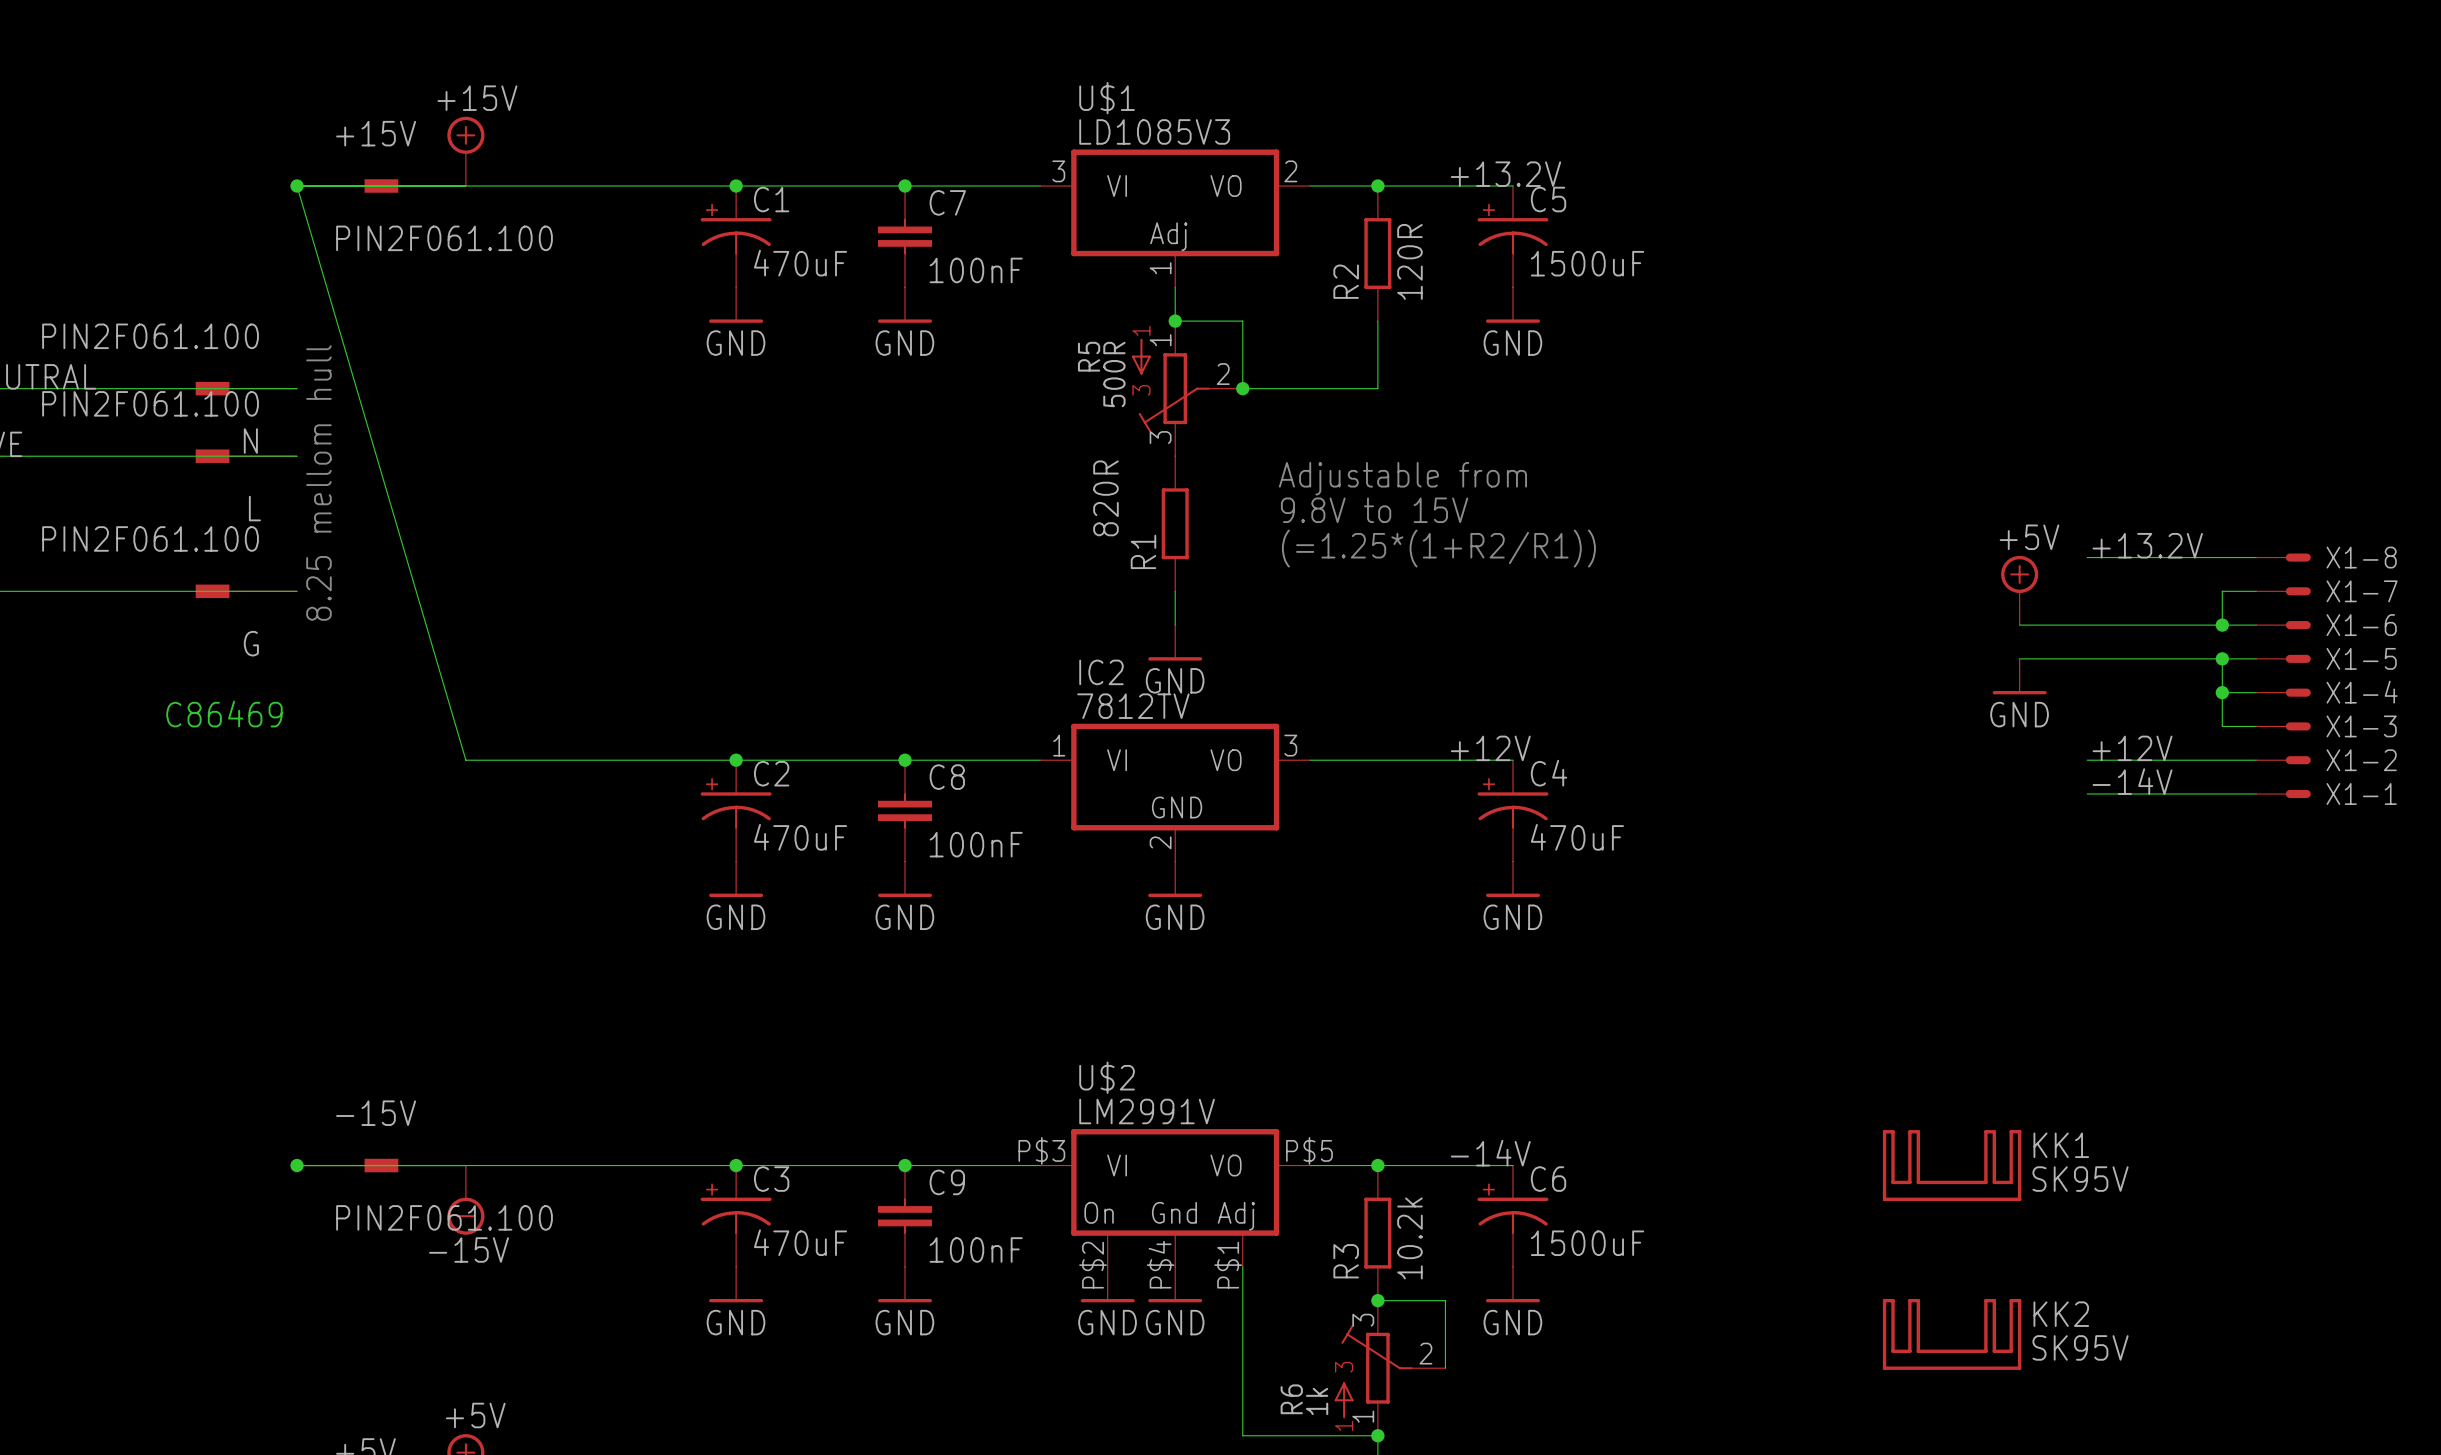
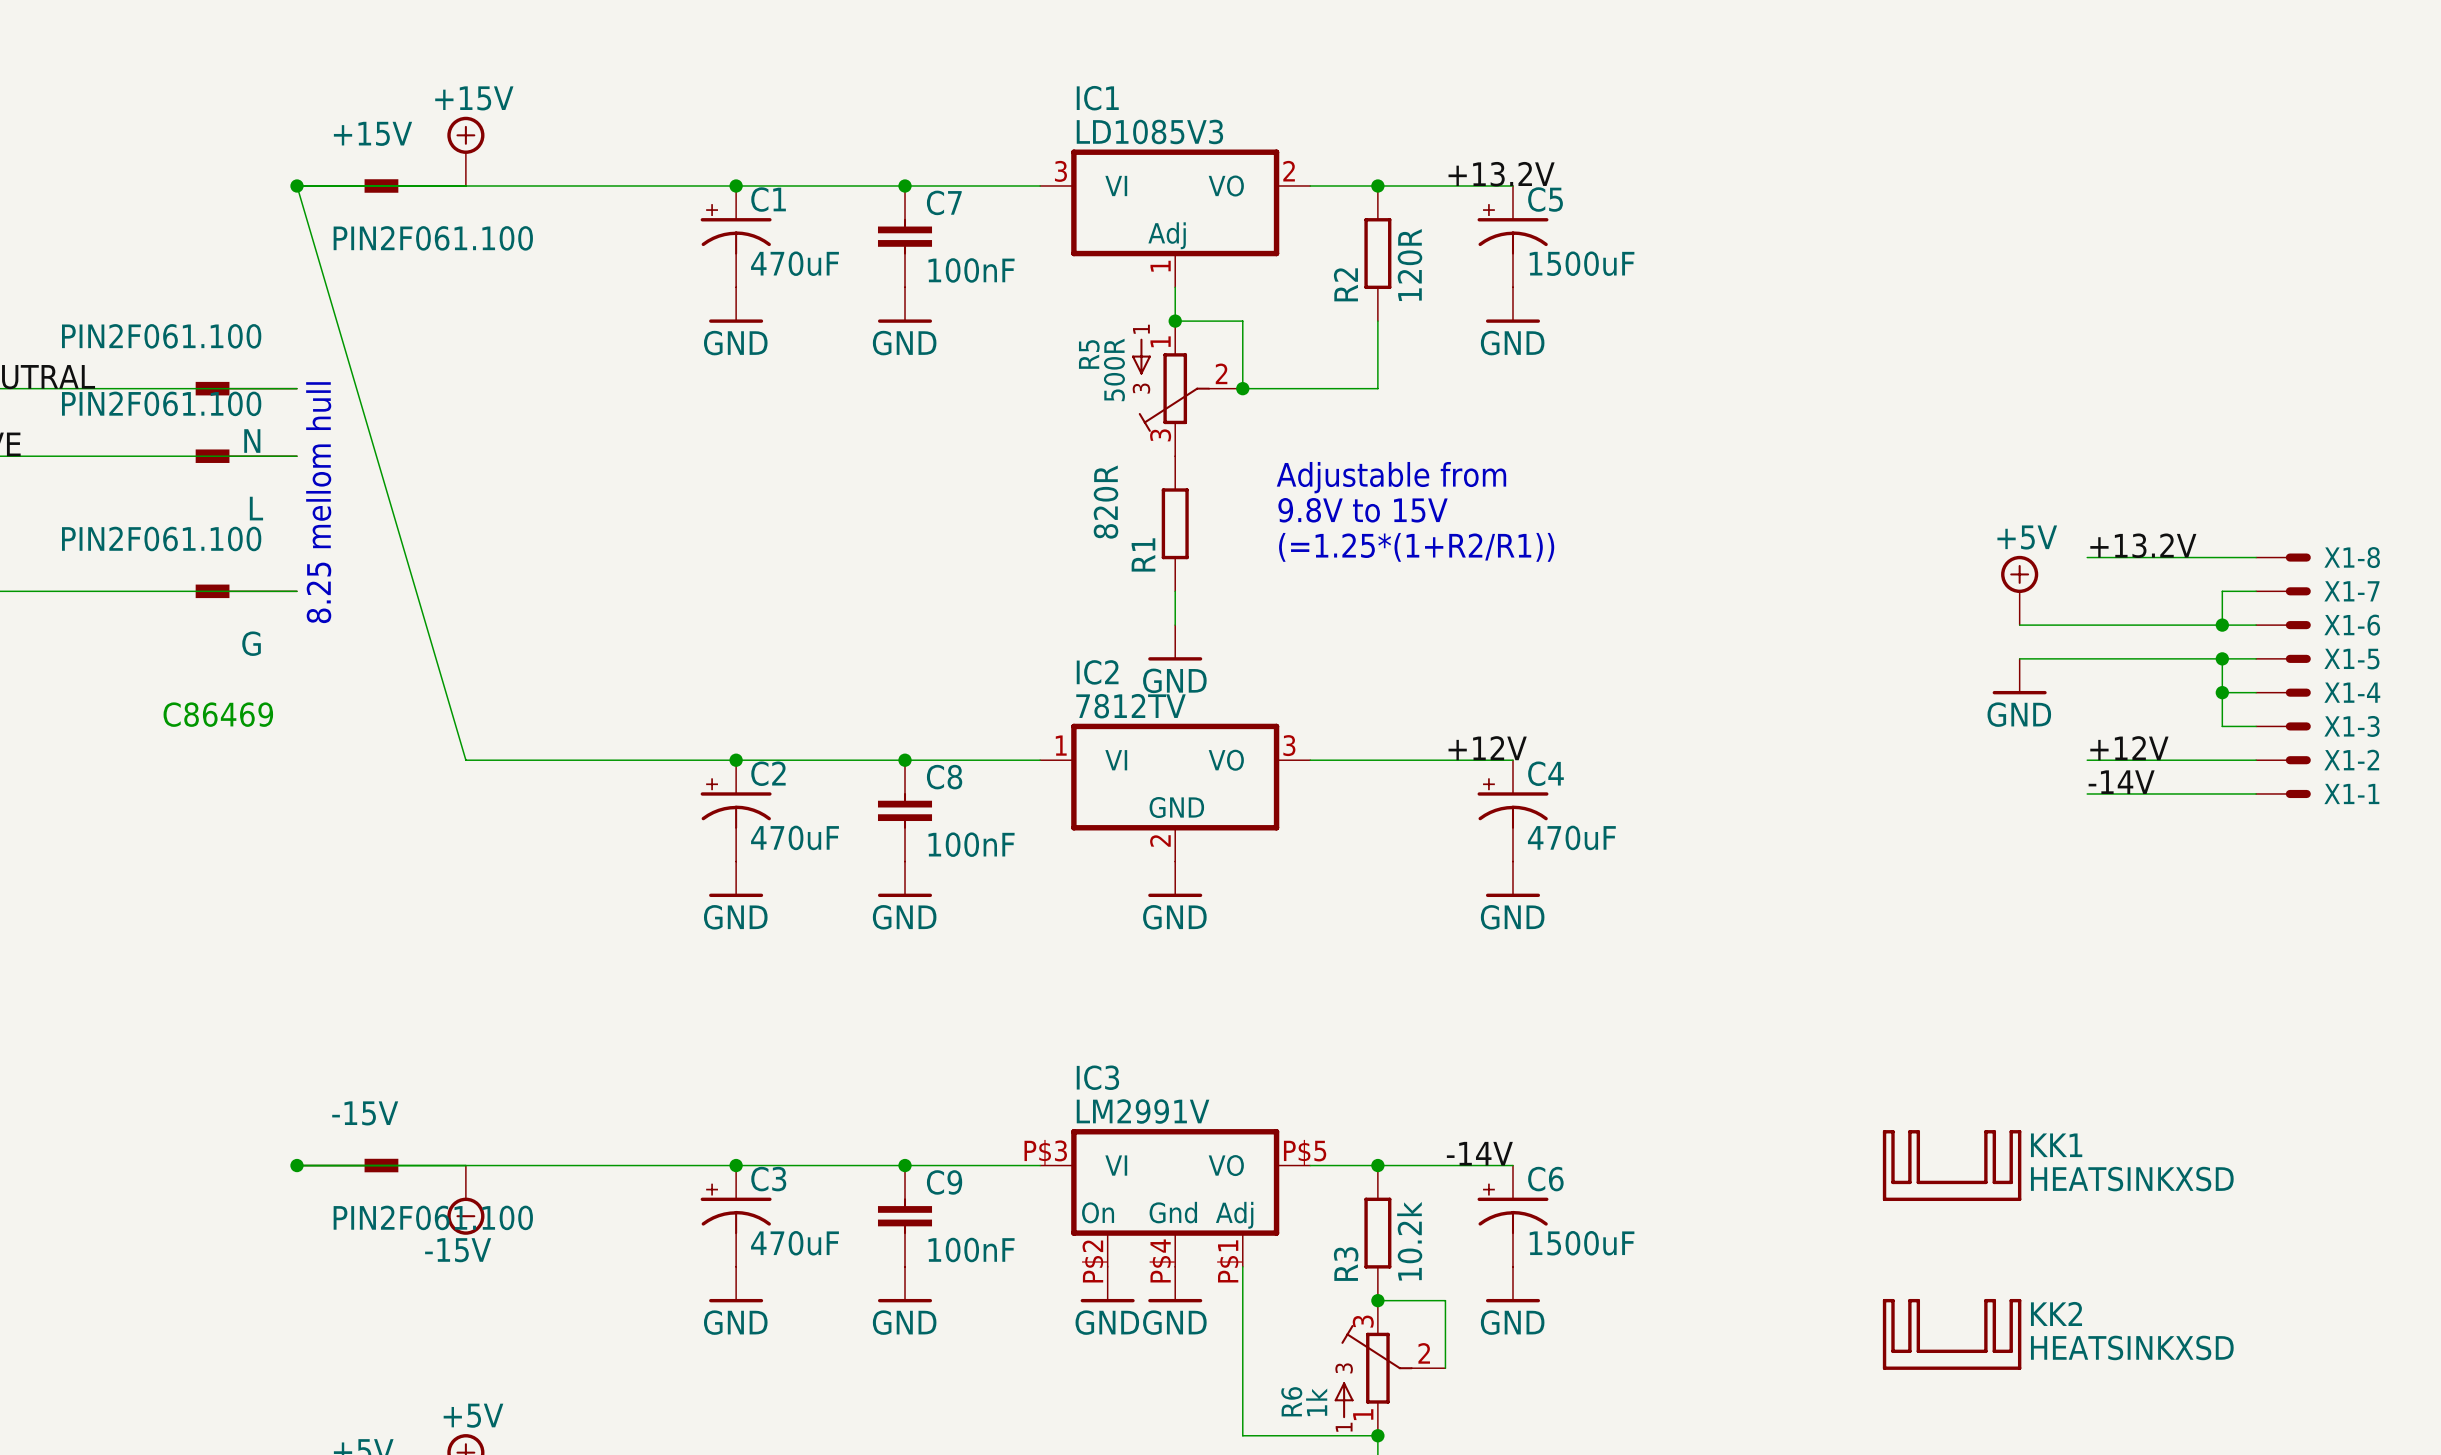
U$1 name: U$1 (1107, 98) -> IC1 (1097, 98)
U$2 name: U$2 (1107, 1077) -> IC3 (1097, 1077)
KK1 value: SK95V (2080, 1179) -> HEATSINKXSD (2132, 1179)
KK2 value: SK95V (2080, 1347) -> HEATSINKXSD (2132, 1347)

